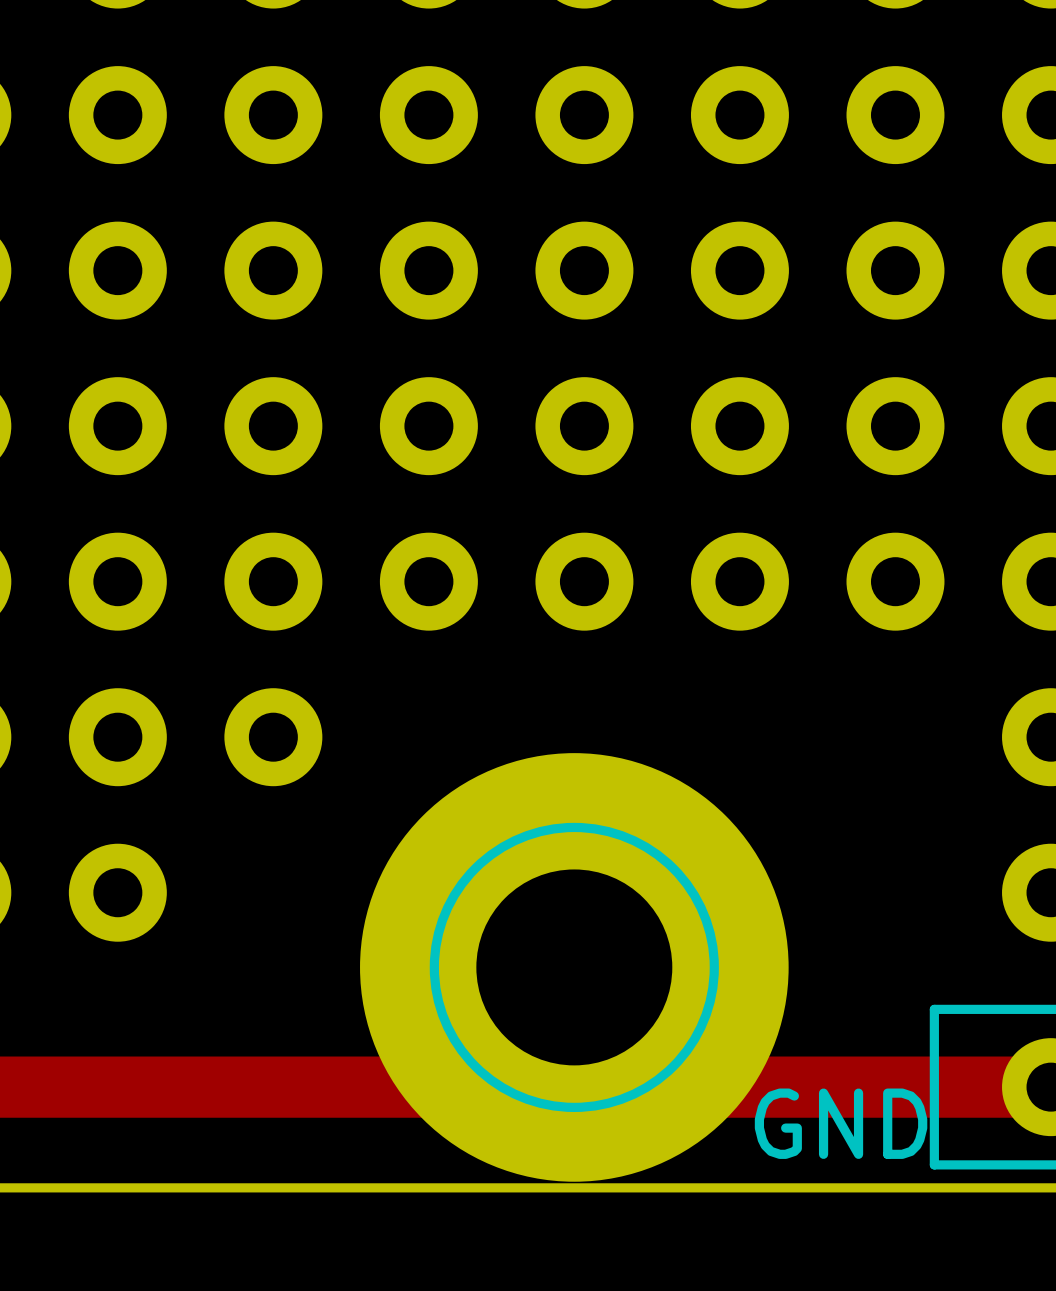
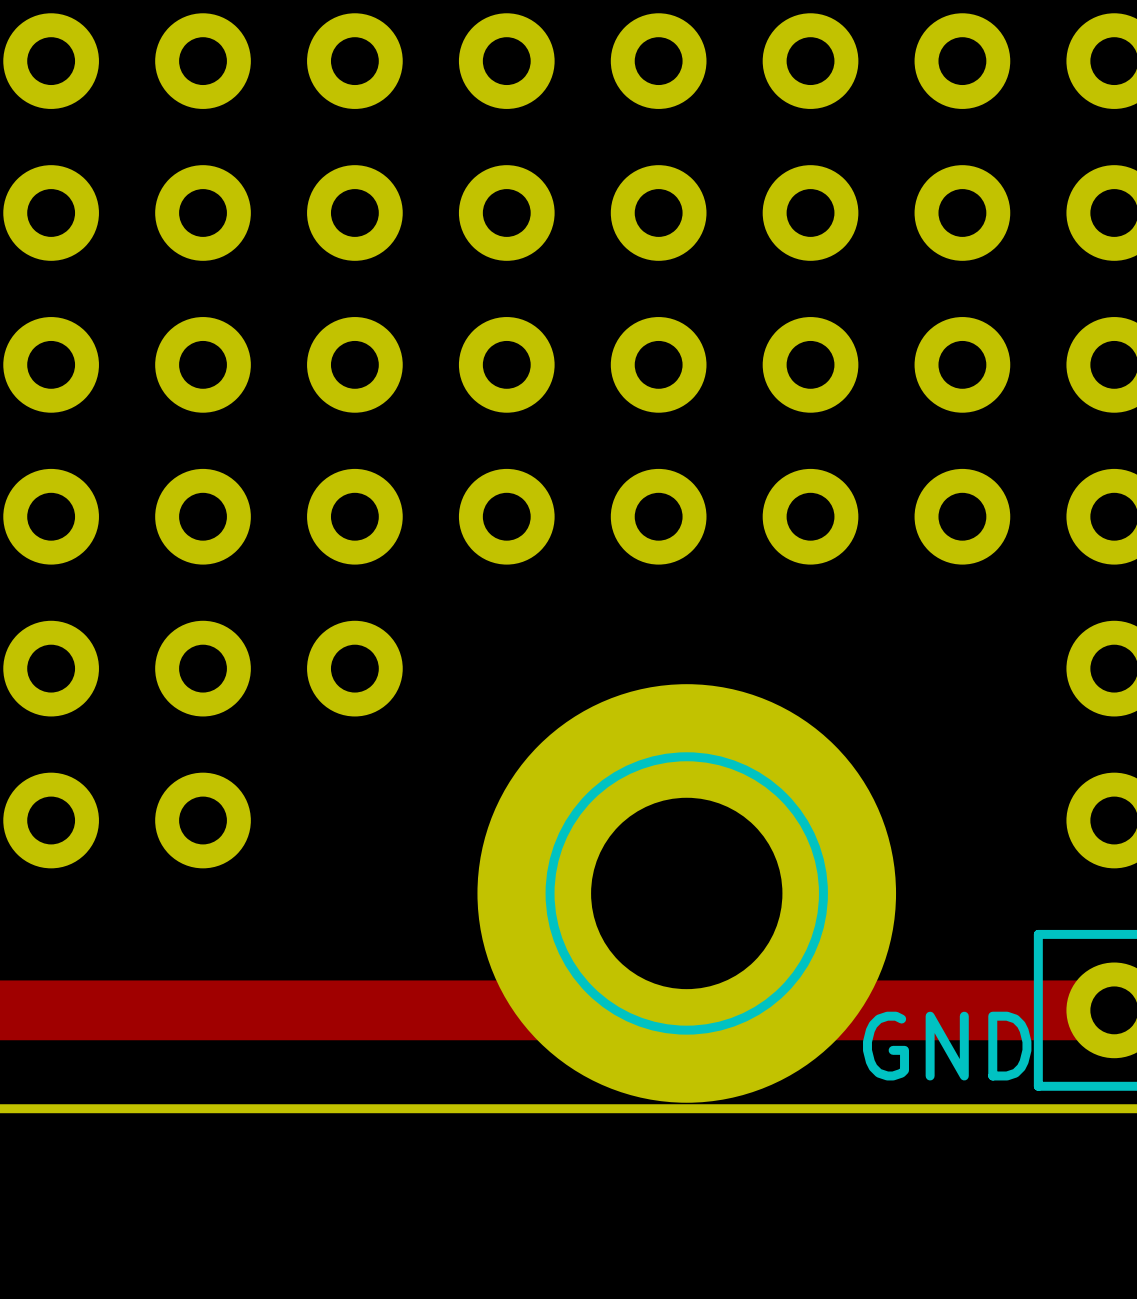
part position: (574, 967) -> (686, 893)
line: (973, 1009) (934, 1009) (934, 1164) (973, 1164) -> (1038, 934) (1038, 1086)
text position: GND (841, 1123) -> GND (947, 1046)

